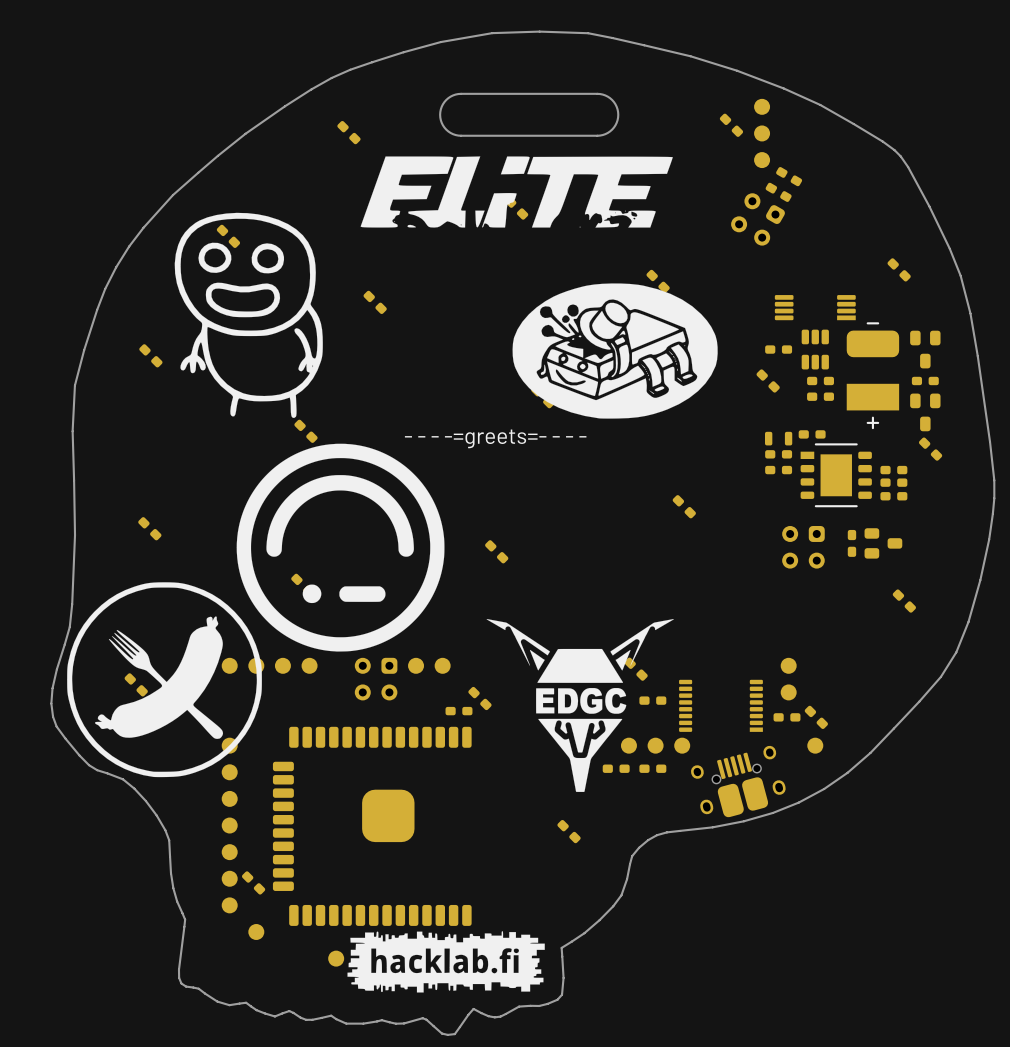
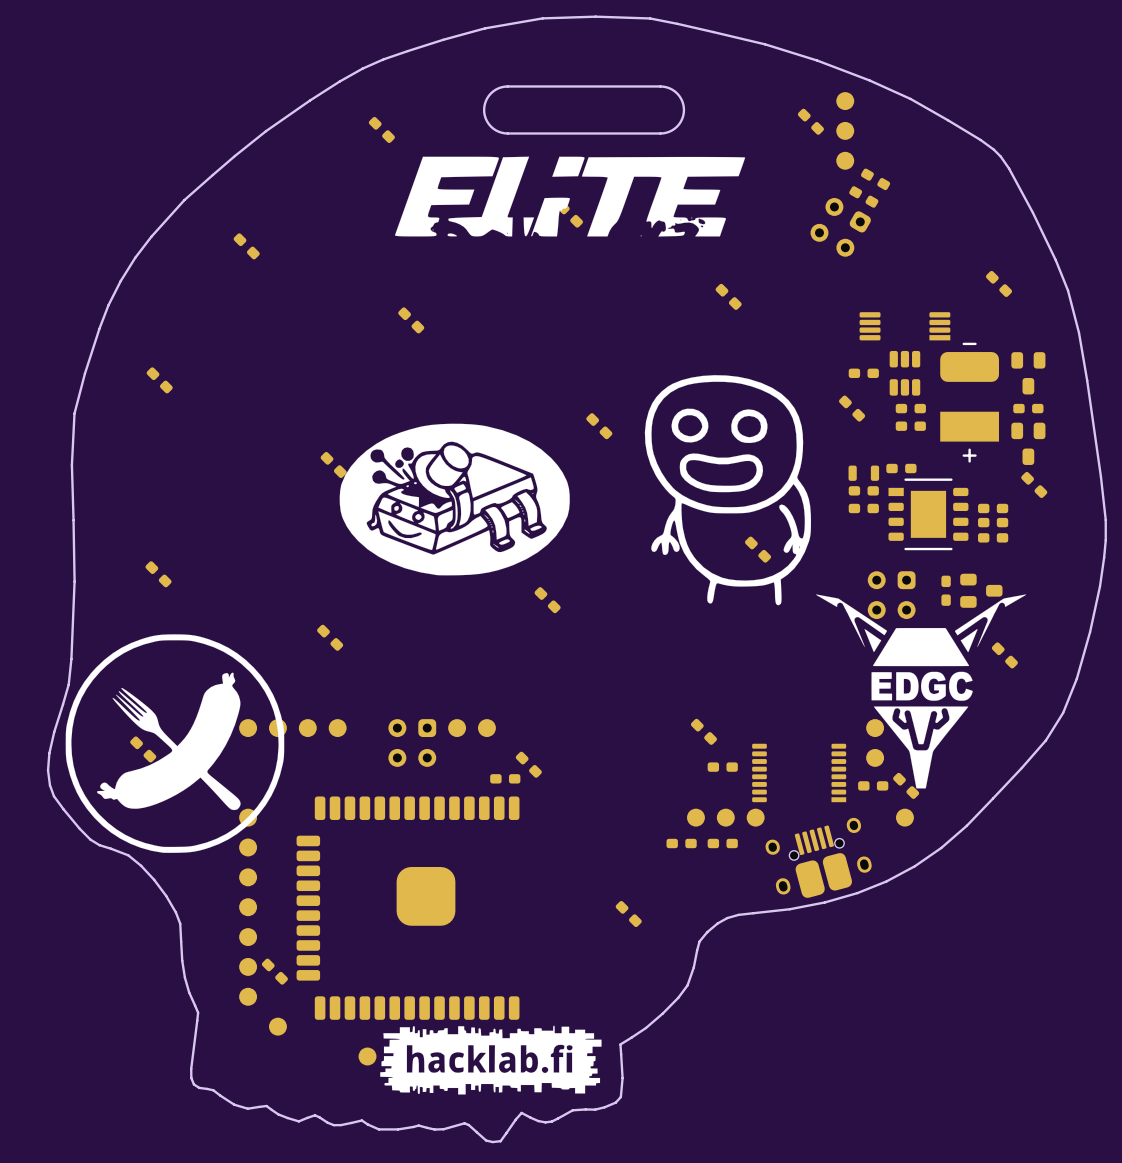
drawing: [174, 212, 323, 419] -> none
drawing: none -> [644, 375, 812, 606]
drawing position: (615, 351) -> (454, 499)
text: - - - -=greets=- - - - (495, 438) -> none
drawing: [236, 443, 445, 652] -> none
drawing position: (580, 705) -> (921, 691)

